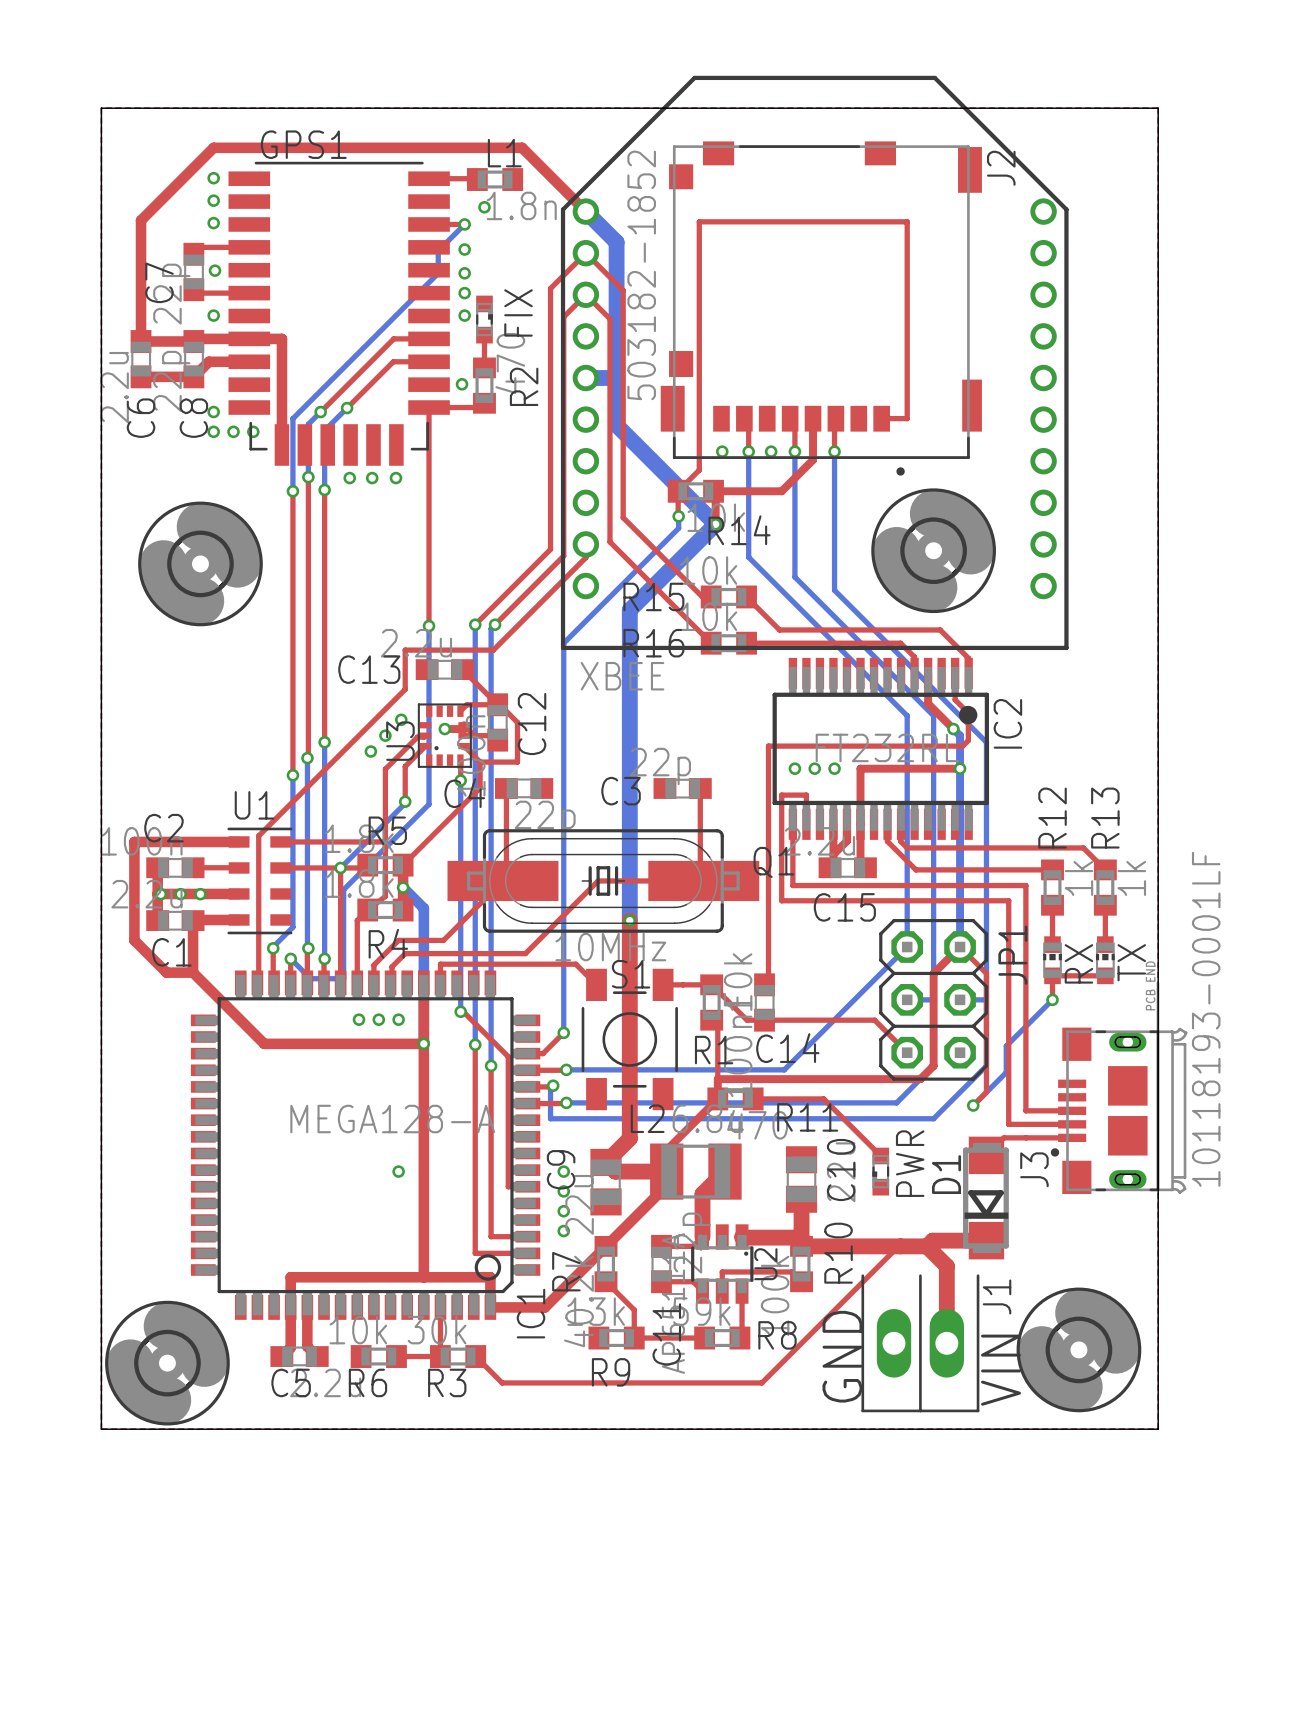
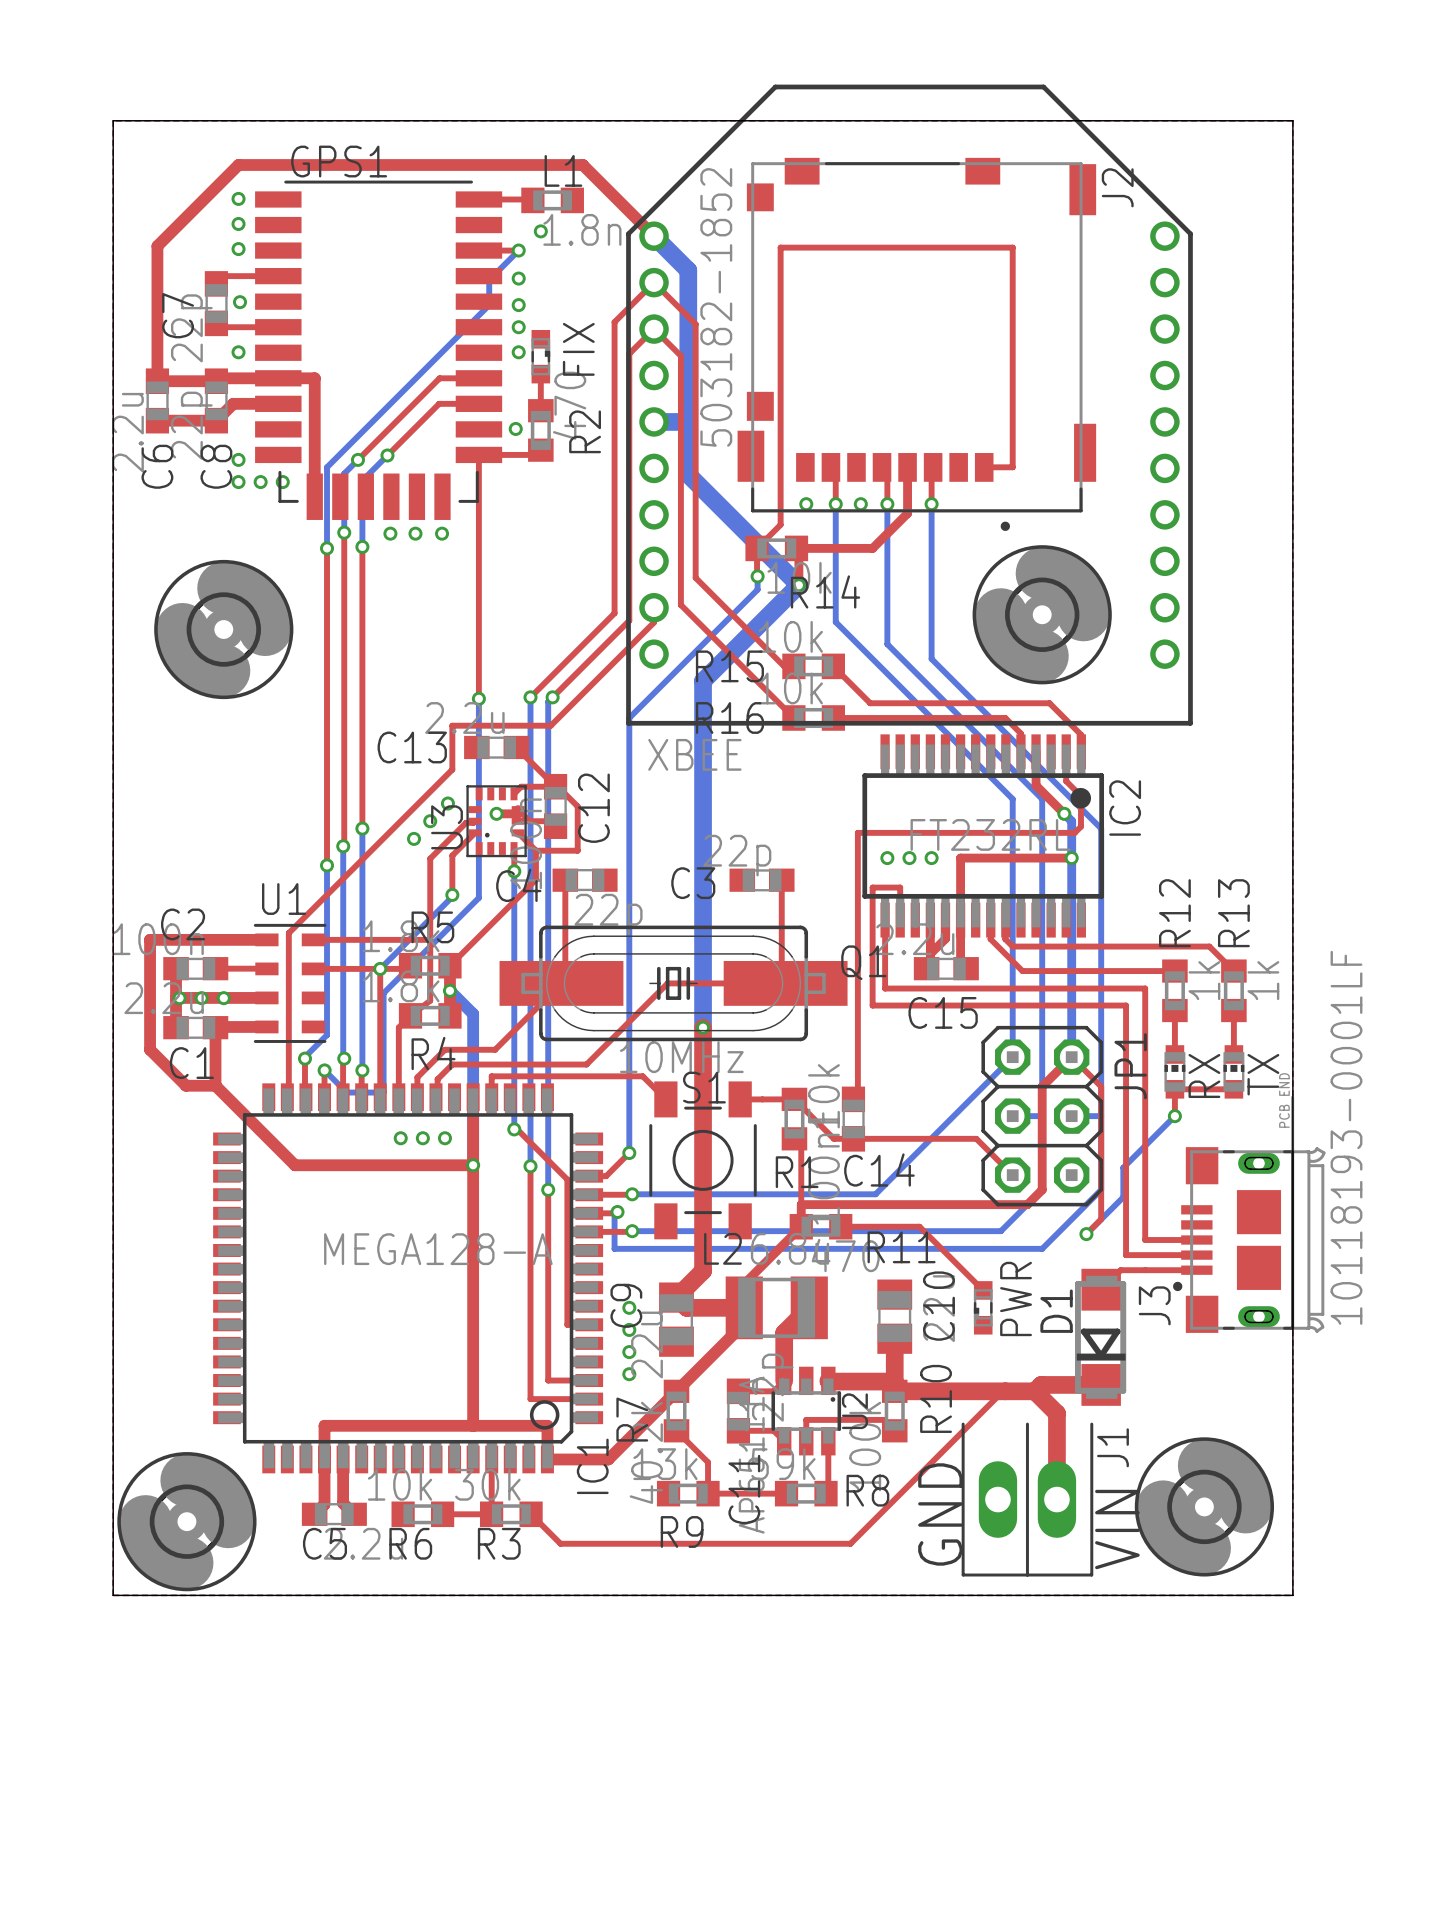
via: (398, 1171) -> none

